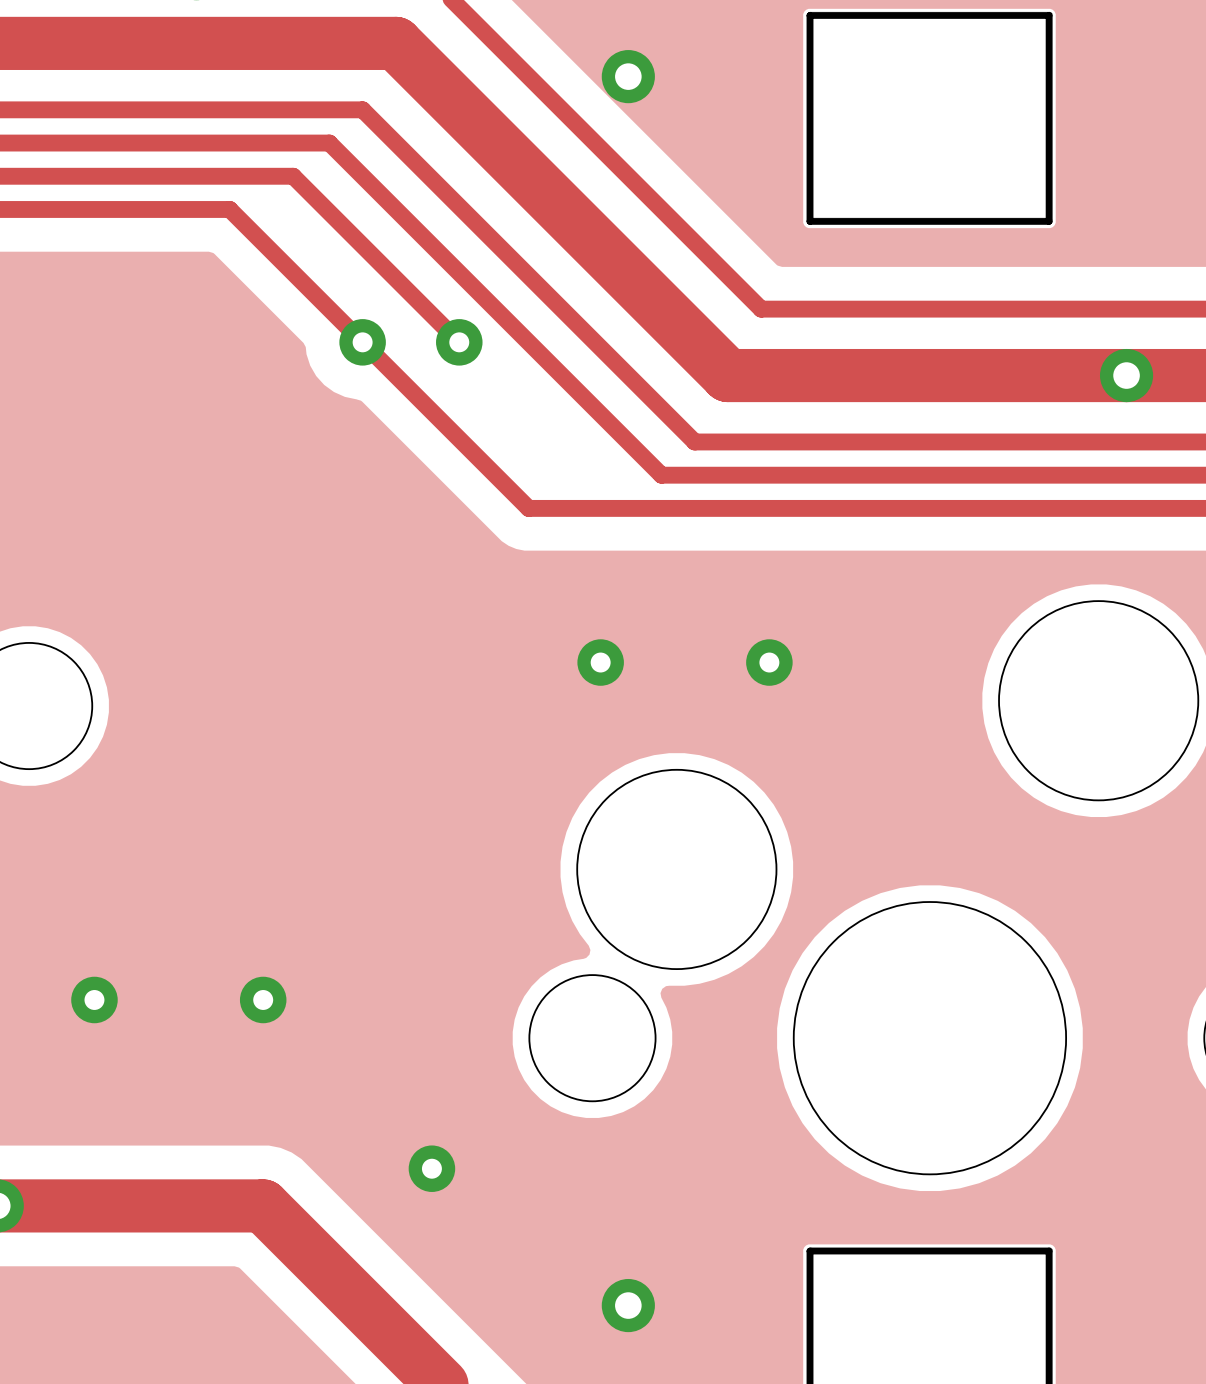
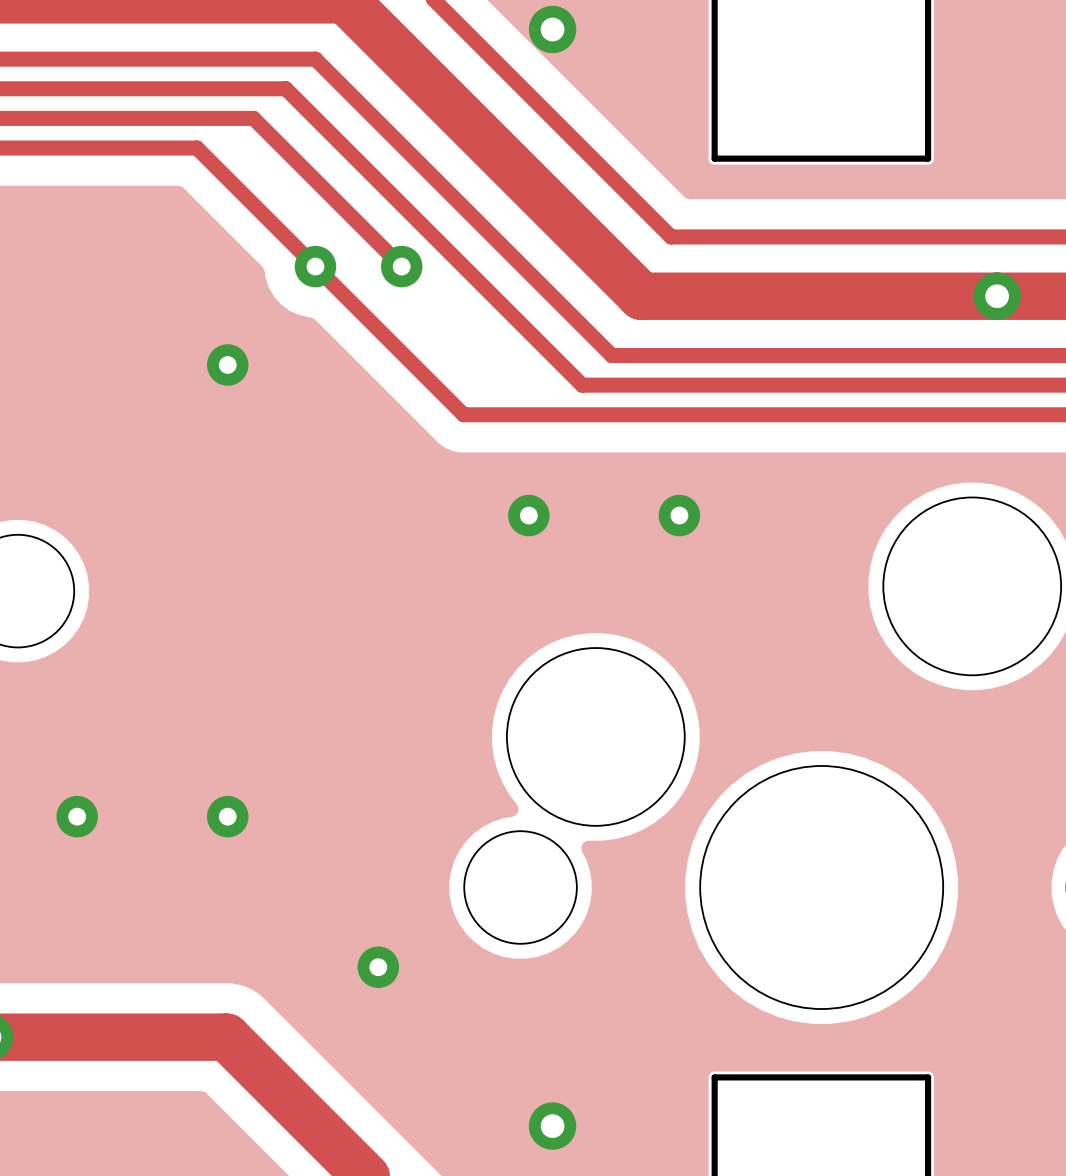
via: none -> (227, 364)
via position: (600, 662) -> (528, 515)
via position: (769, 662) -> (679, 515)
via position: (94, 999) -> (77, 816)
via position: (263, 999) -> (227, 816)
via position: (431, 1168) -> (378, 967)

